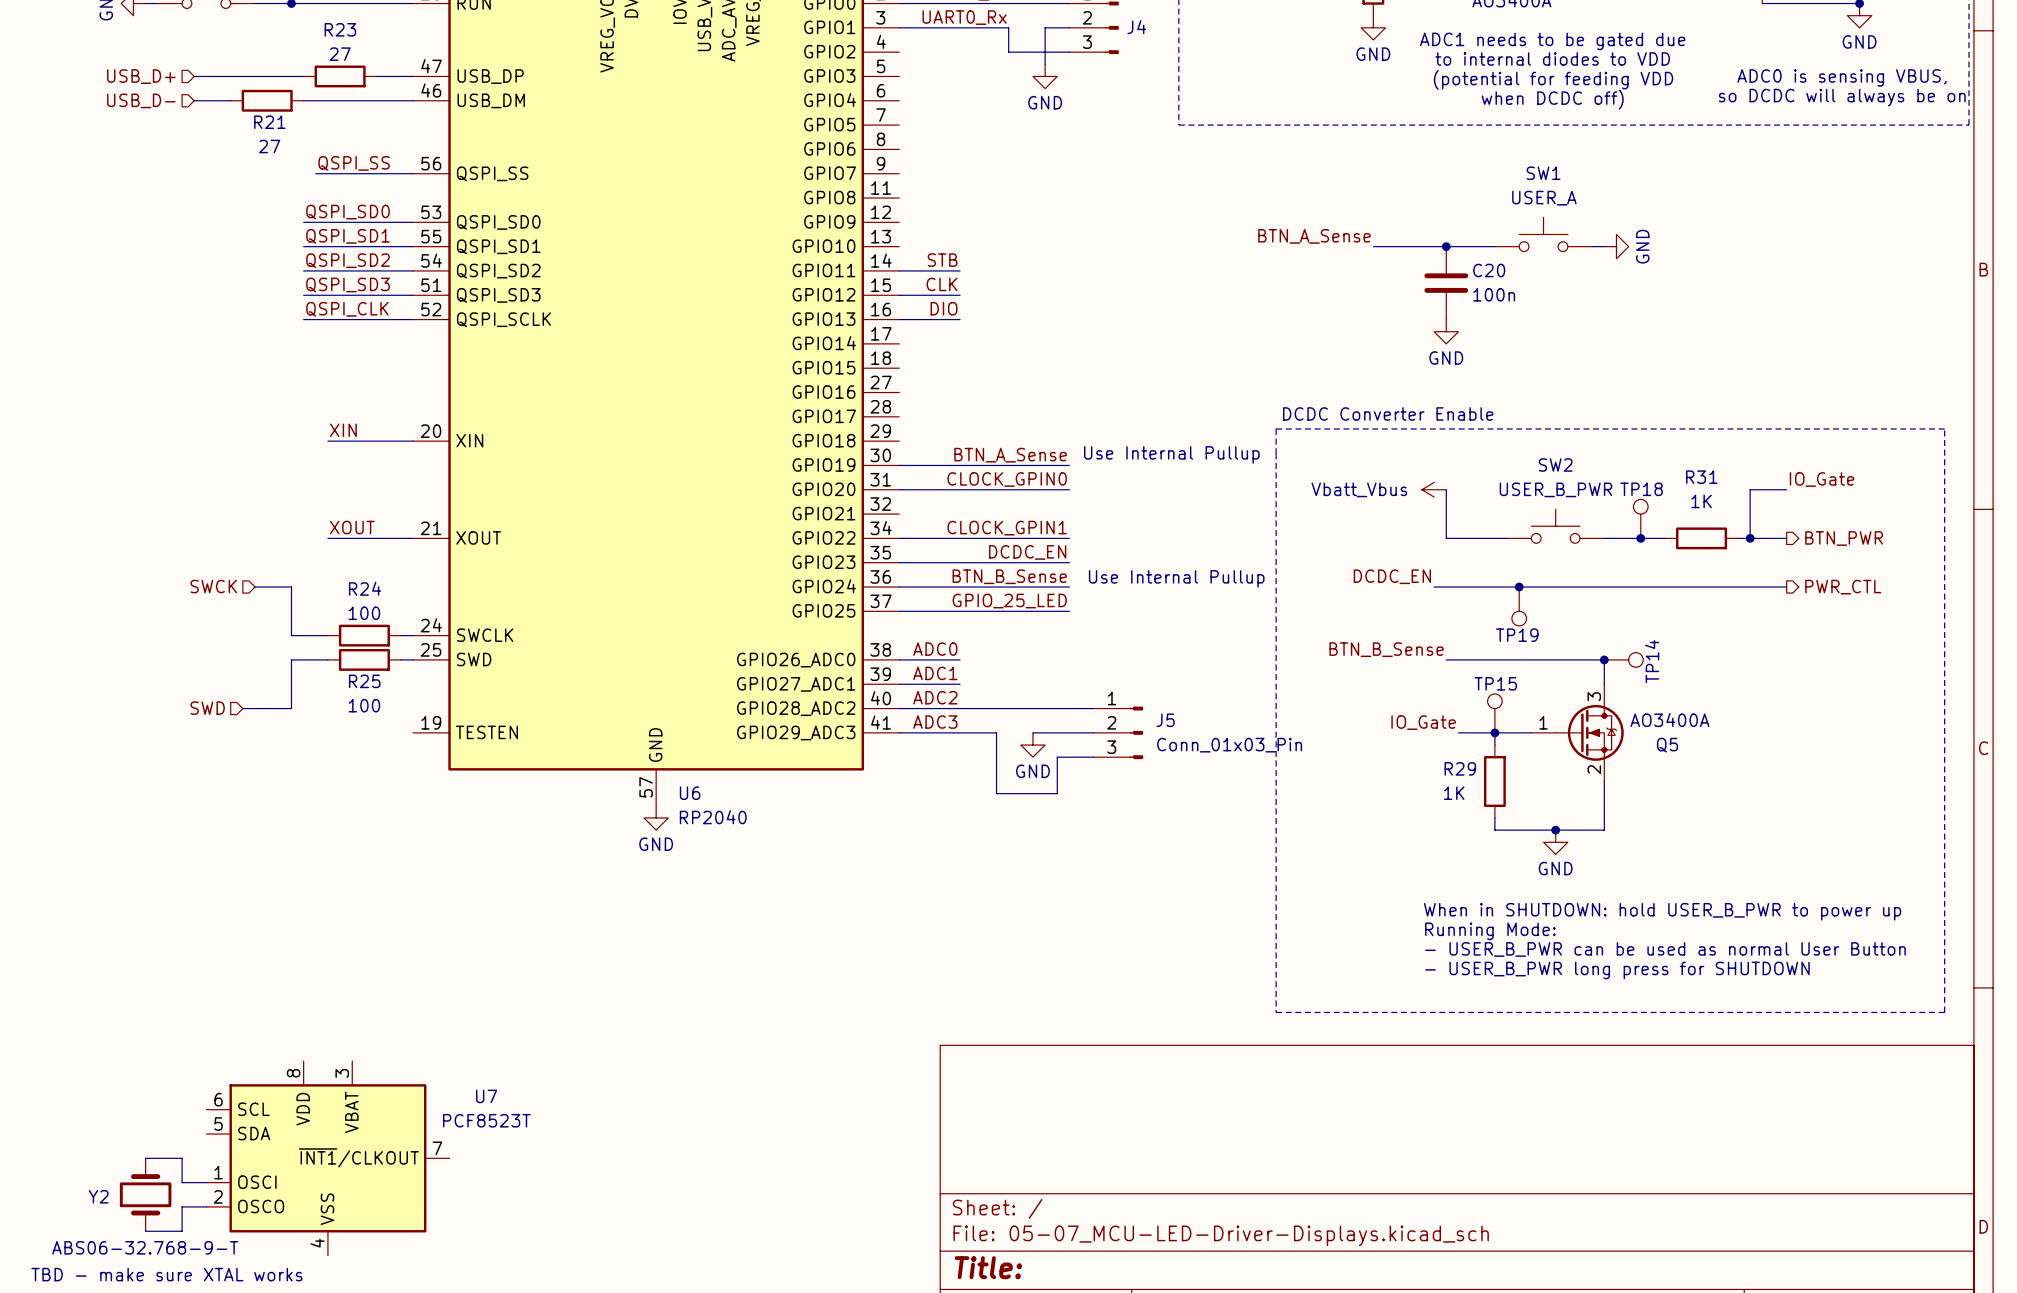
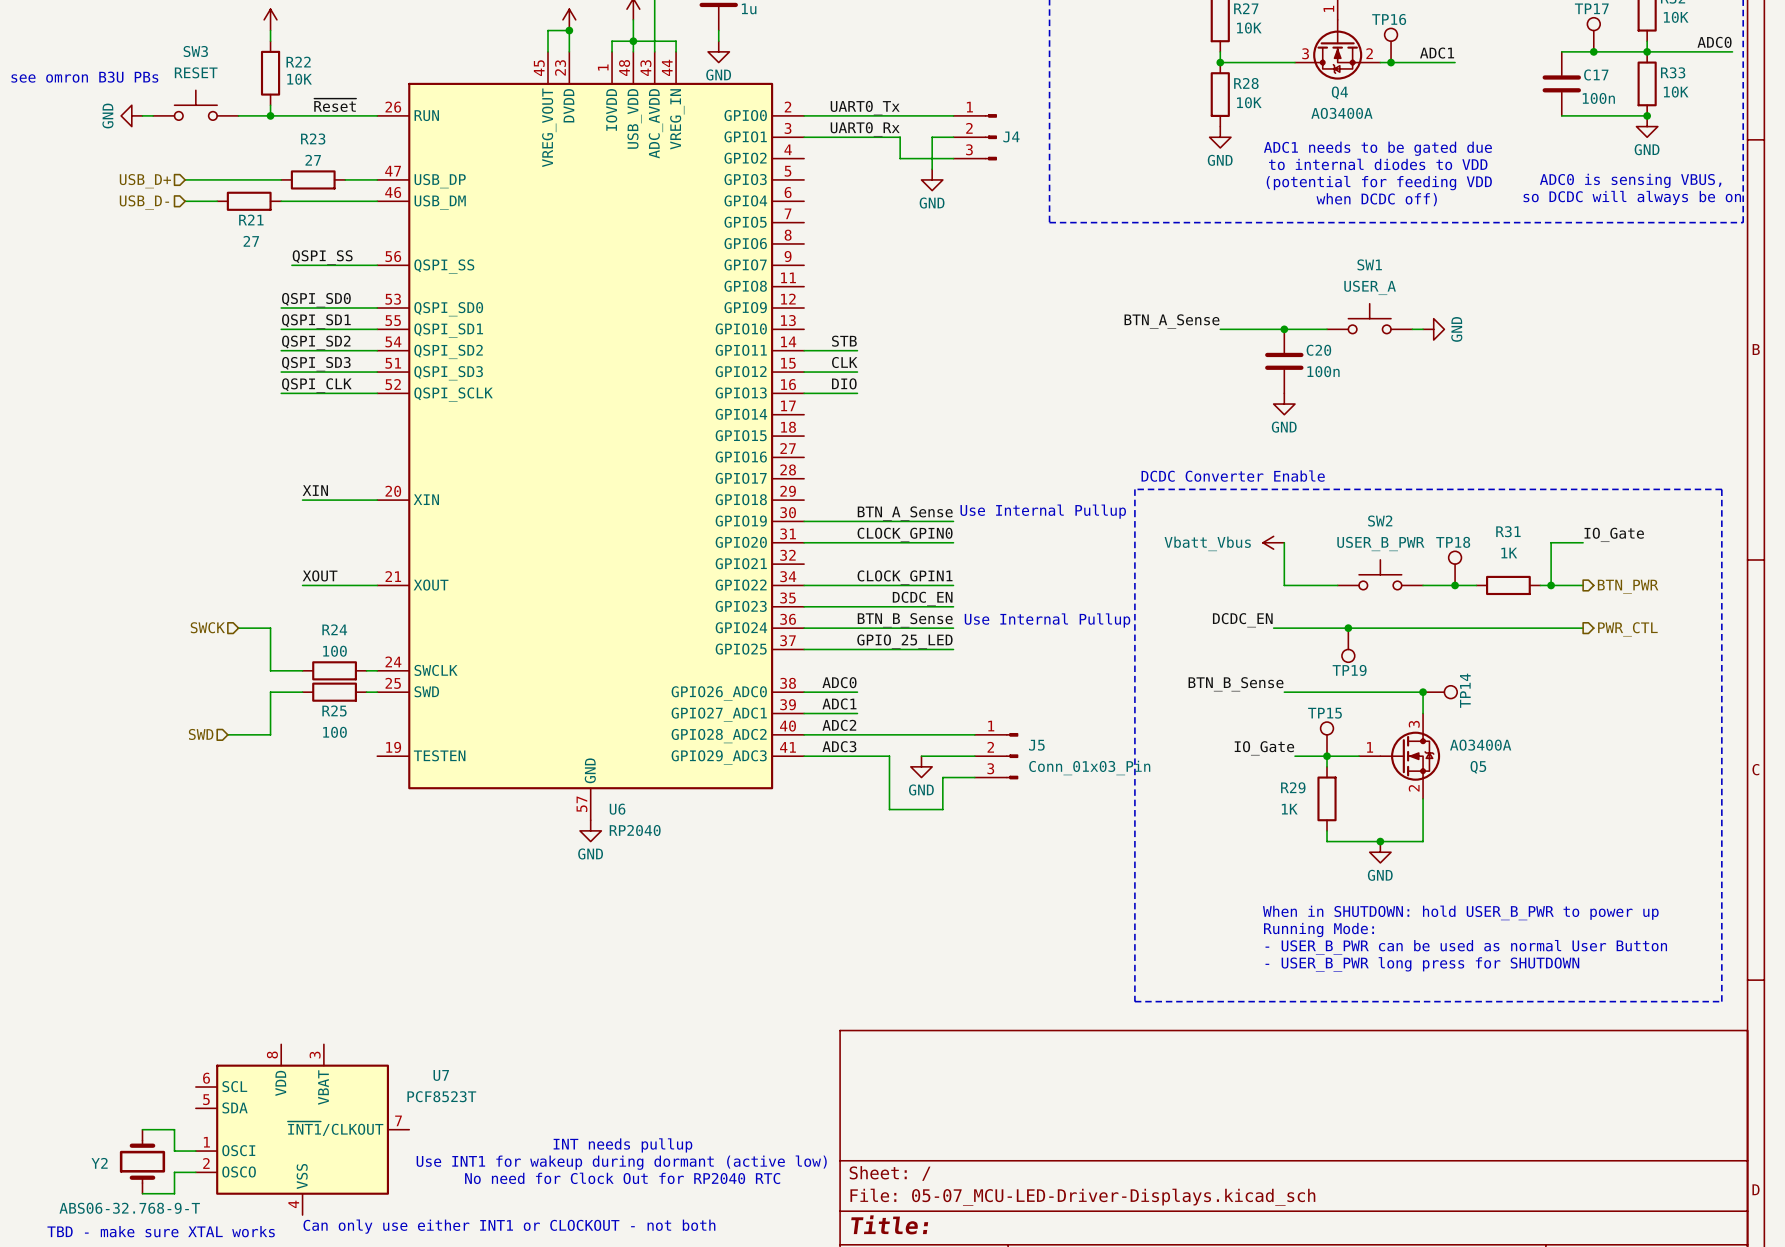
text: none -> INT needs pullup (622, 1145)
text: none -> Use INT1 for wakeup during dormant (active low) (621, 1162)
text: none -> No need for Clock Out for RP2040 RTC (622, 1178)
text: none -> Can only use either INT1 or CLOCKOUT - not both (509, 1226)

